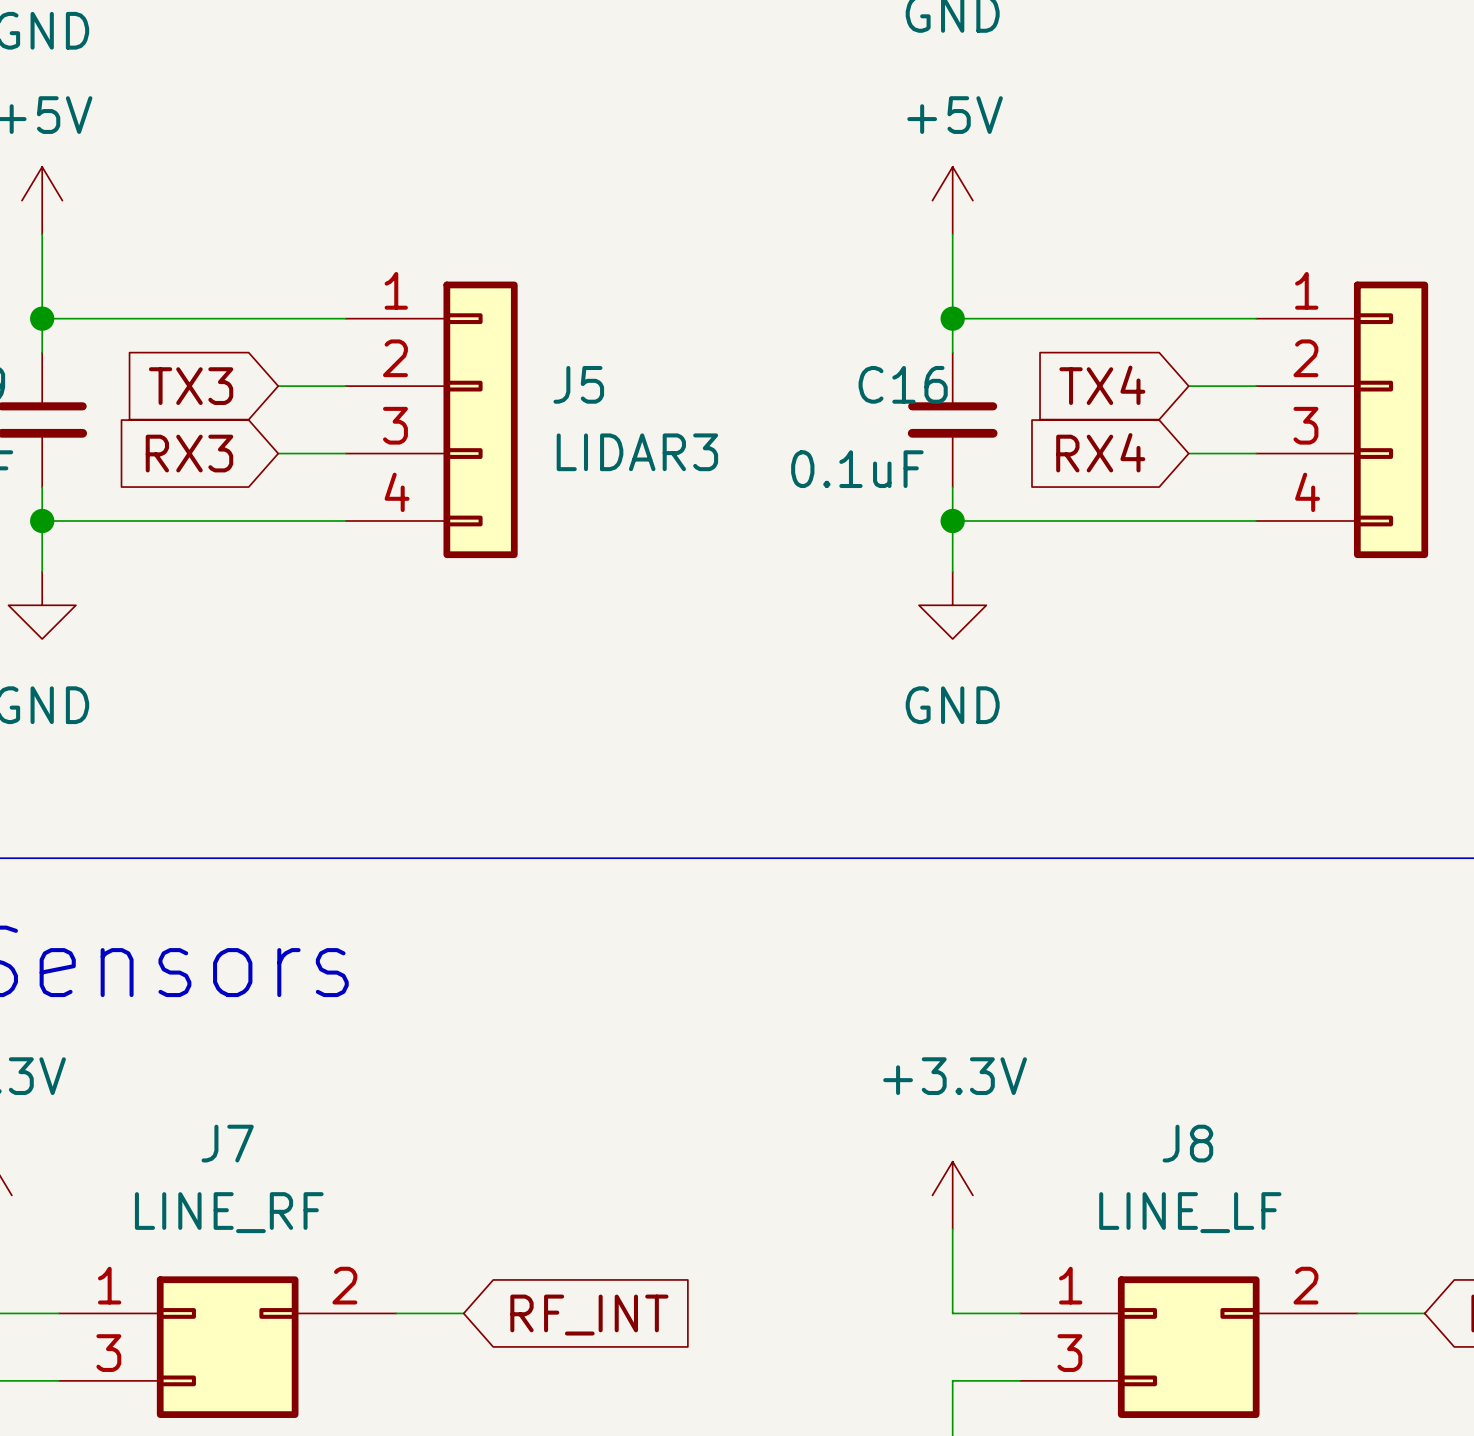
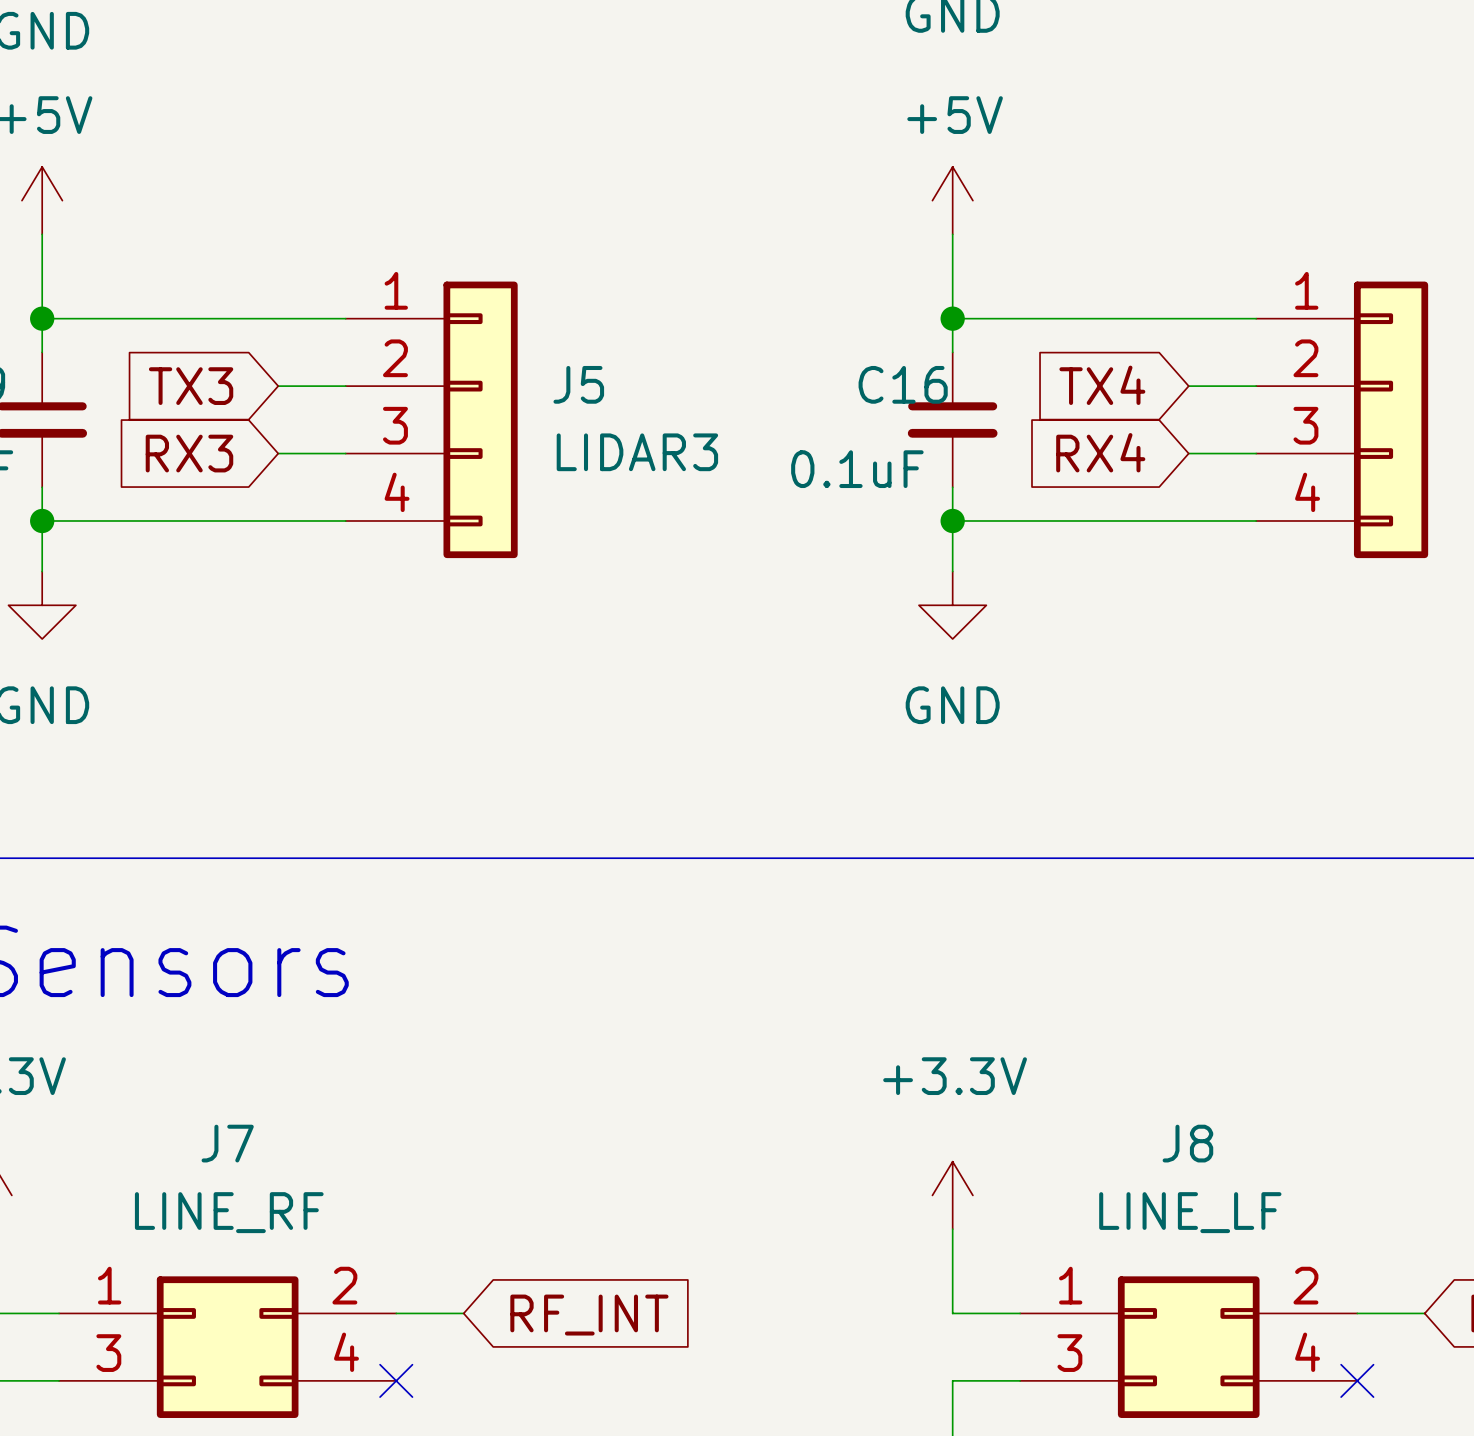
J7 symbol: [59, 1276, 397, 1418] -> [59, 1276, 397, 1418]
J8 symbol: [1020, 1276, 1358, 1418] -> [1020, 1276, 1358, 1418]
no-connect mark: none -> (396, 1380)
no-connect mark: none -> (1357, 1380)

